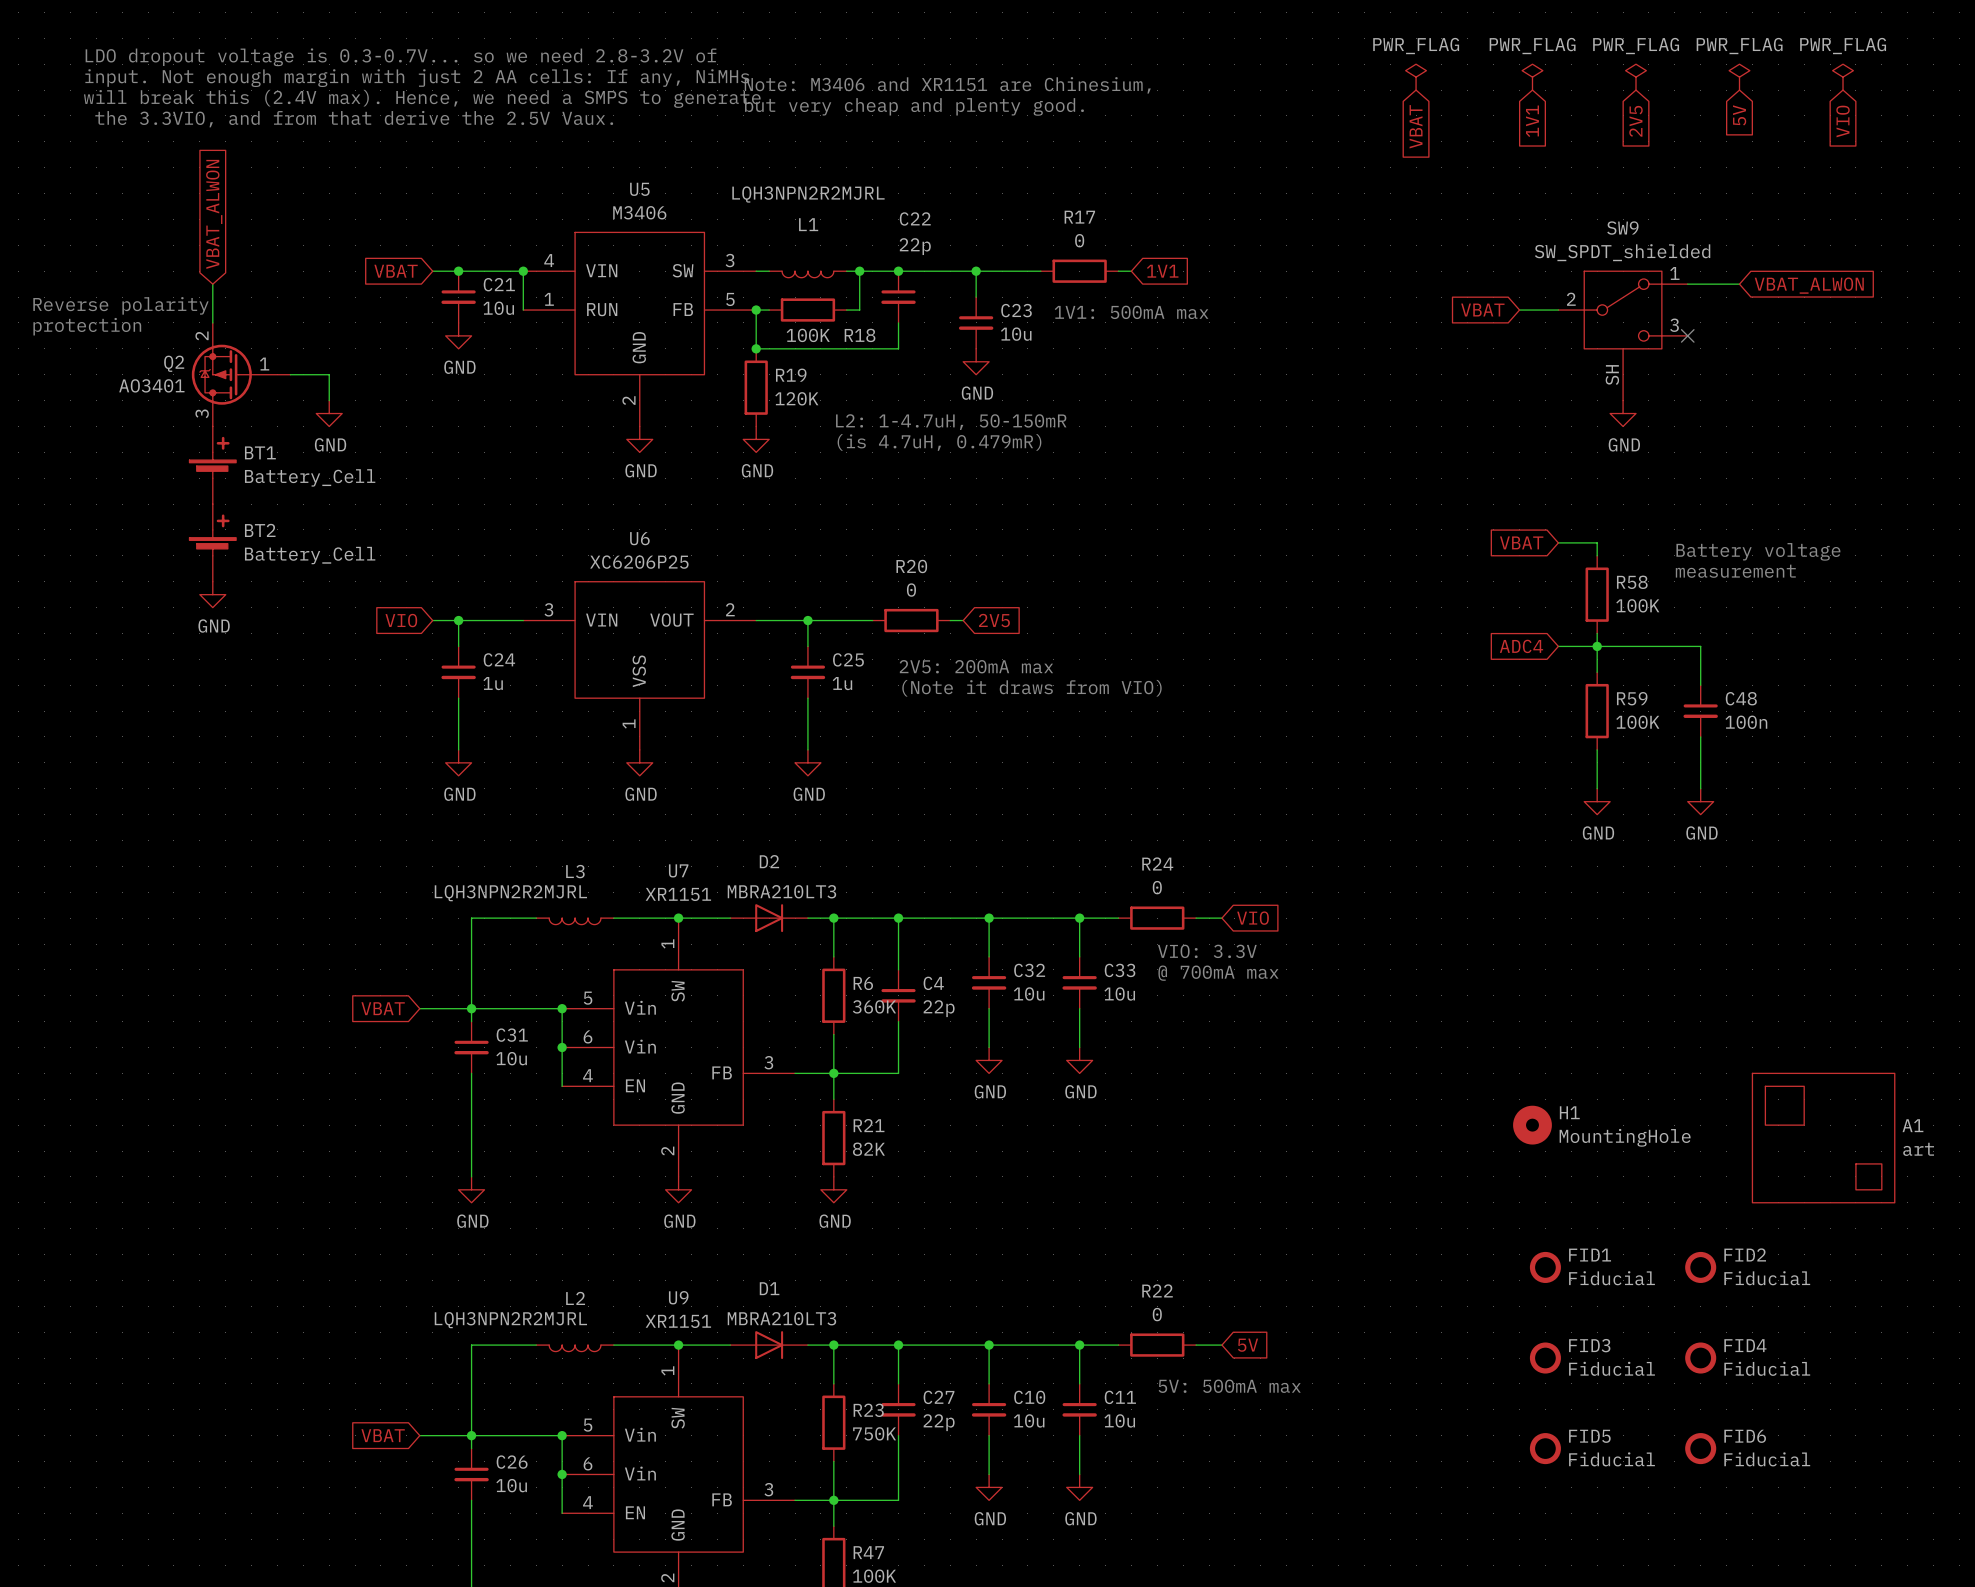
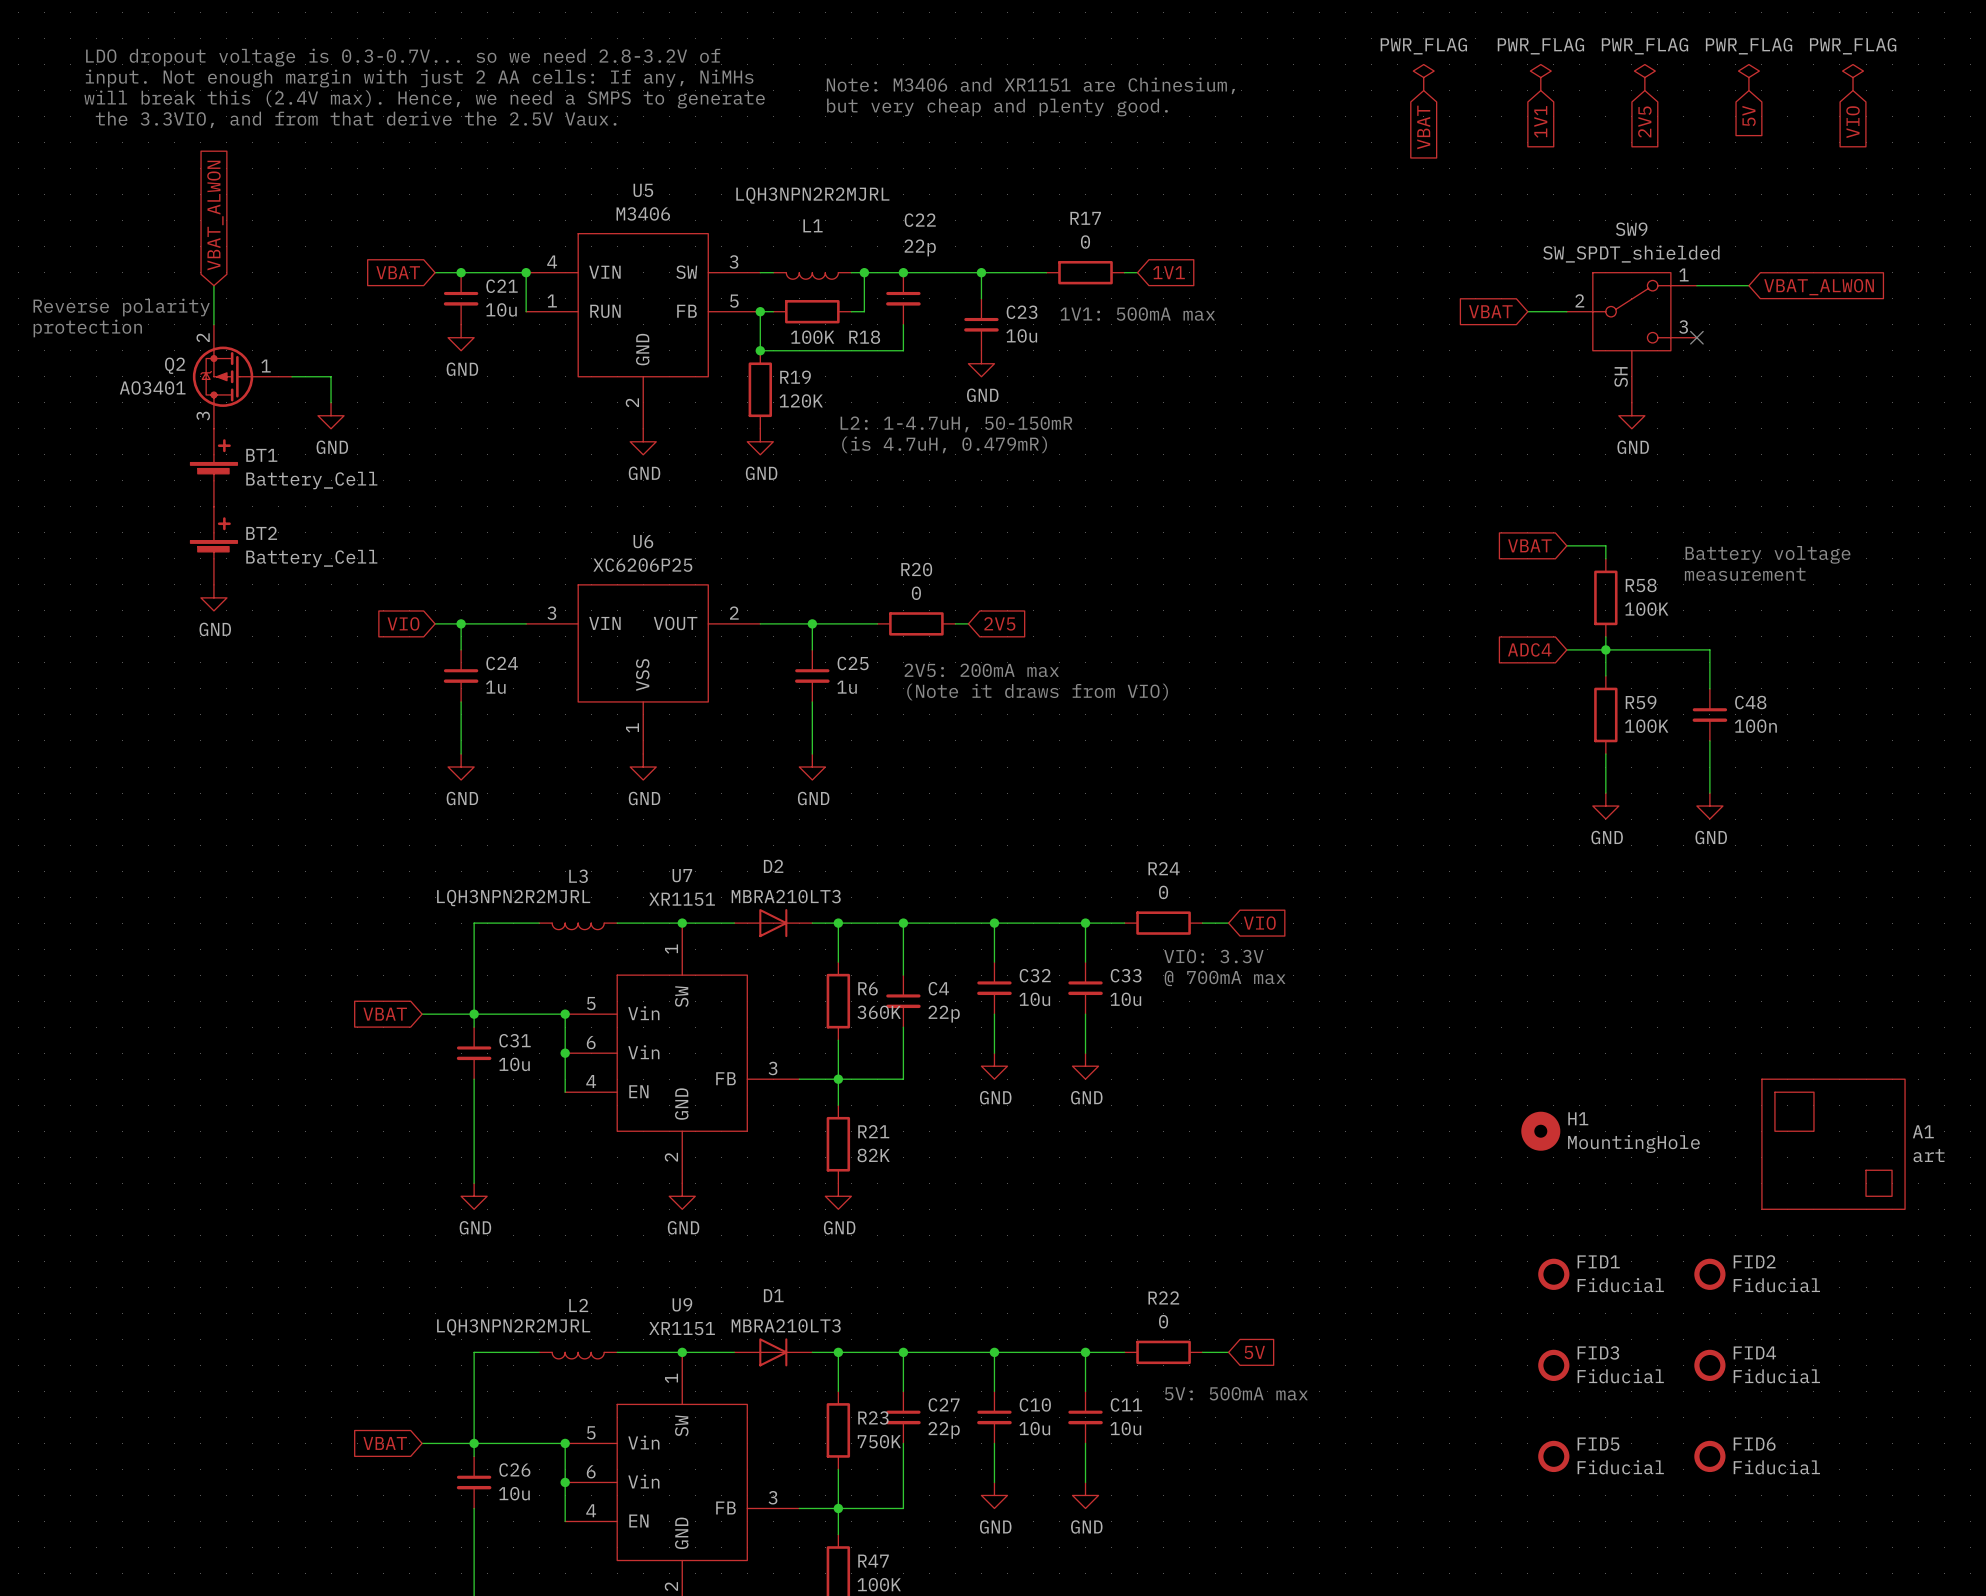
text position: Note: M3406 and XR1151 are Chinesium, (947, 85) -> Note: M3406 and XR1151 are Chinesium, (1030, 85)
text position: but very cheap and plenty good. (914, 106) -> but very cheap and plenty good. (997, 107)

